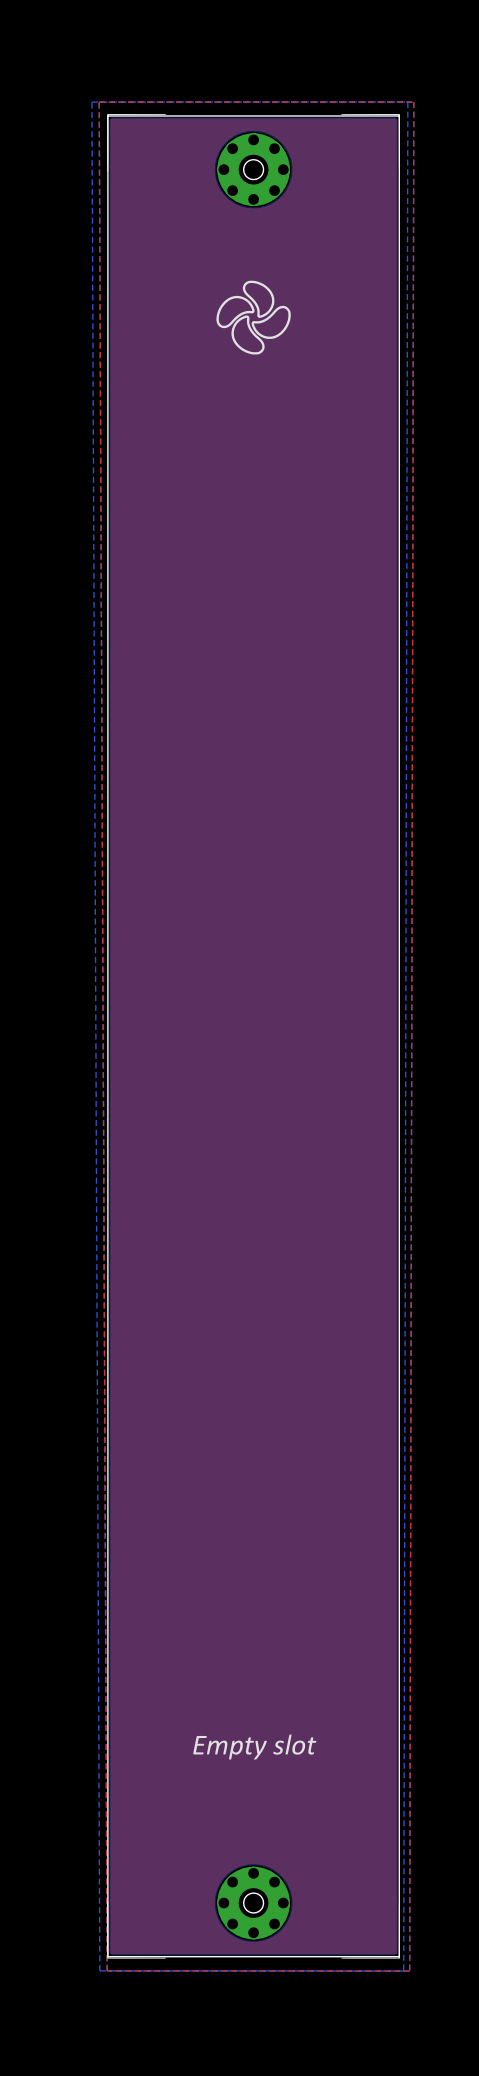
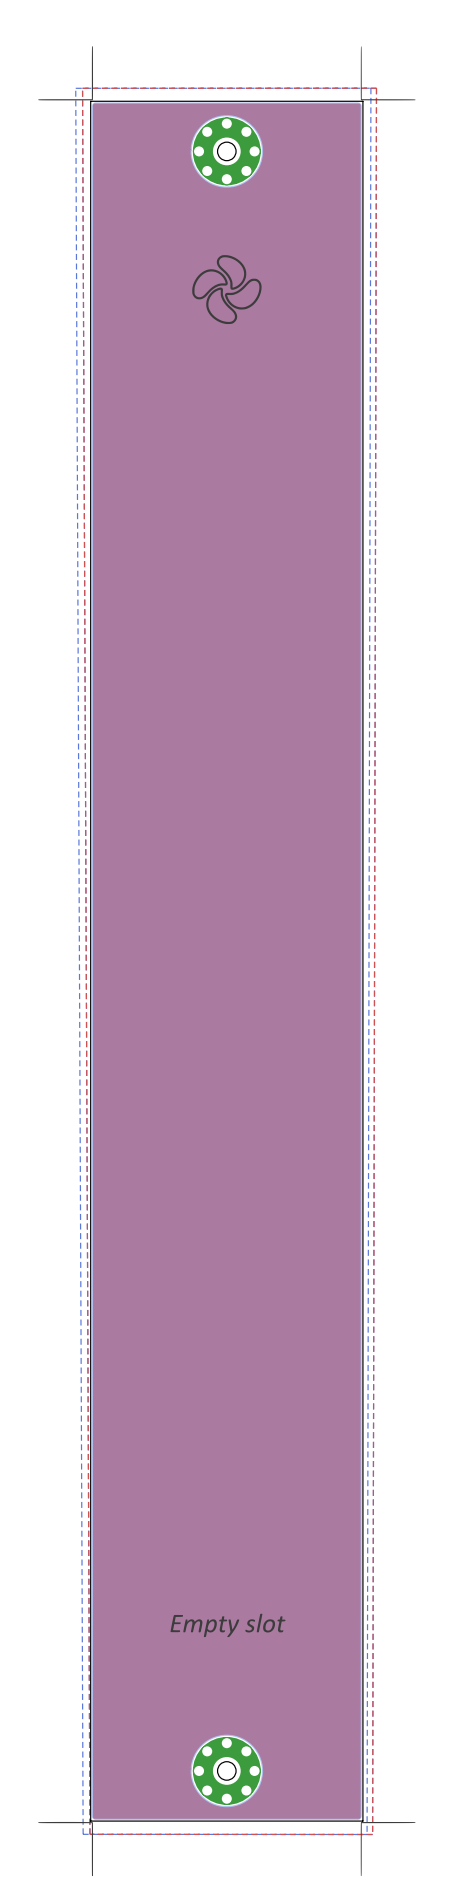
drawing shape: [107, 114, 400, 1959] -> [38, 46, 416, 1877]

